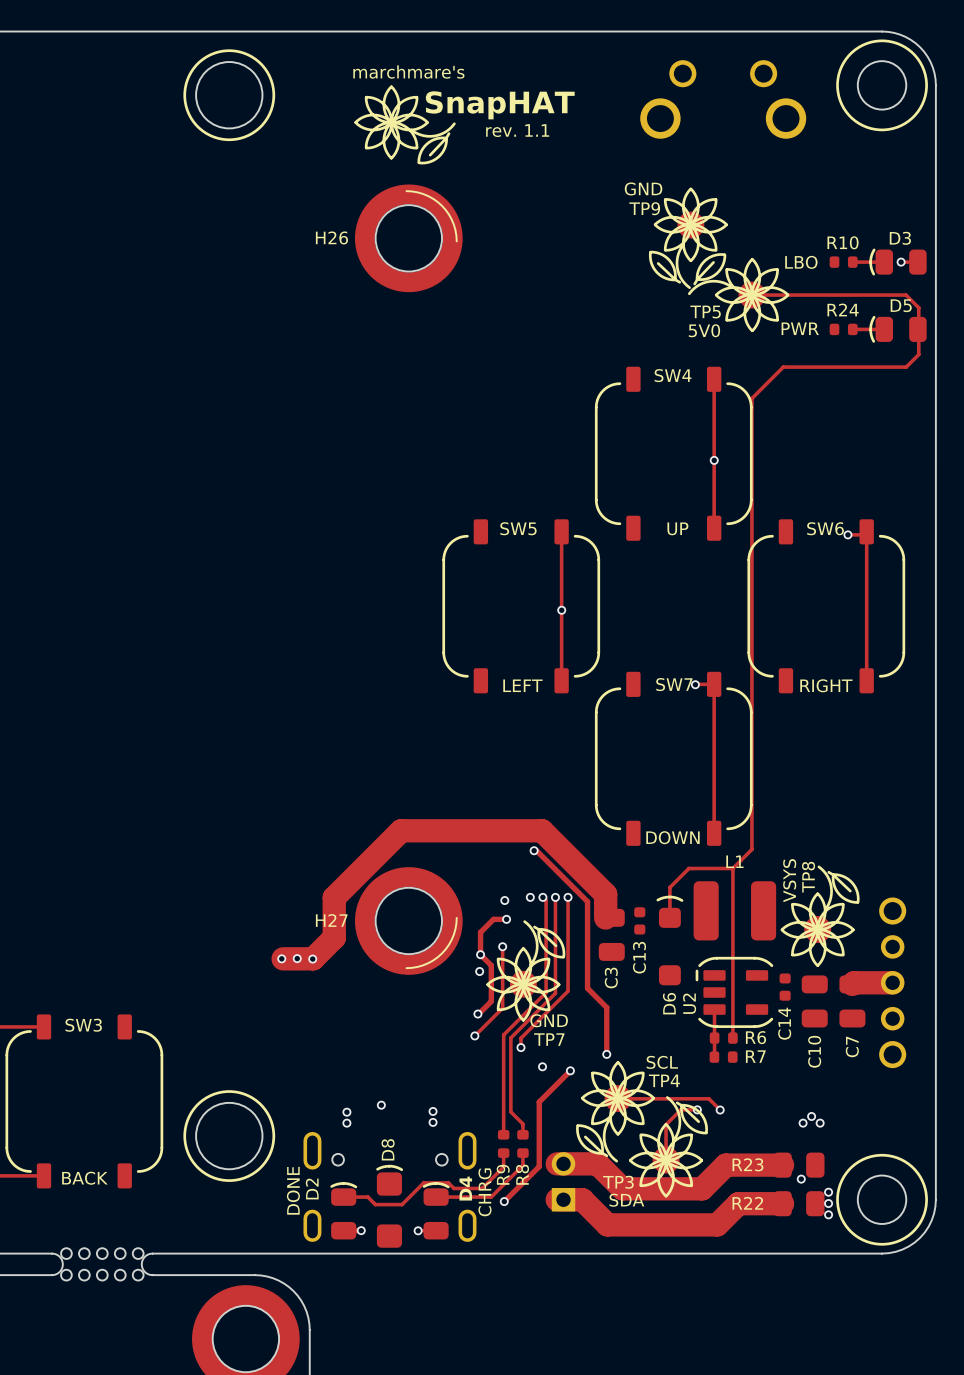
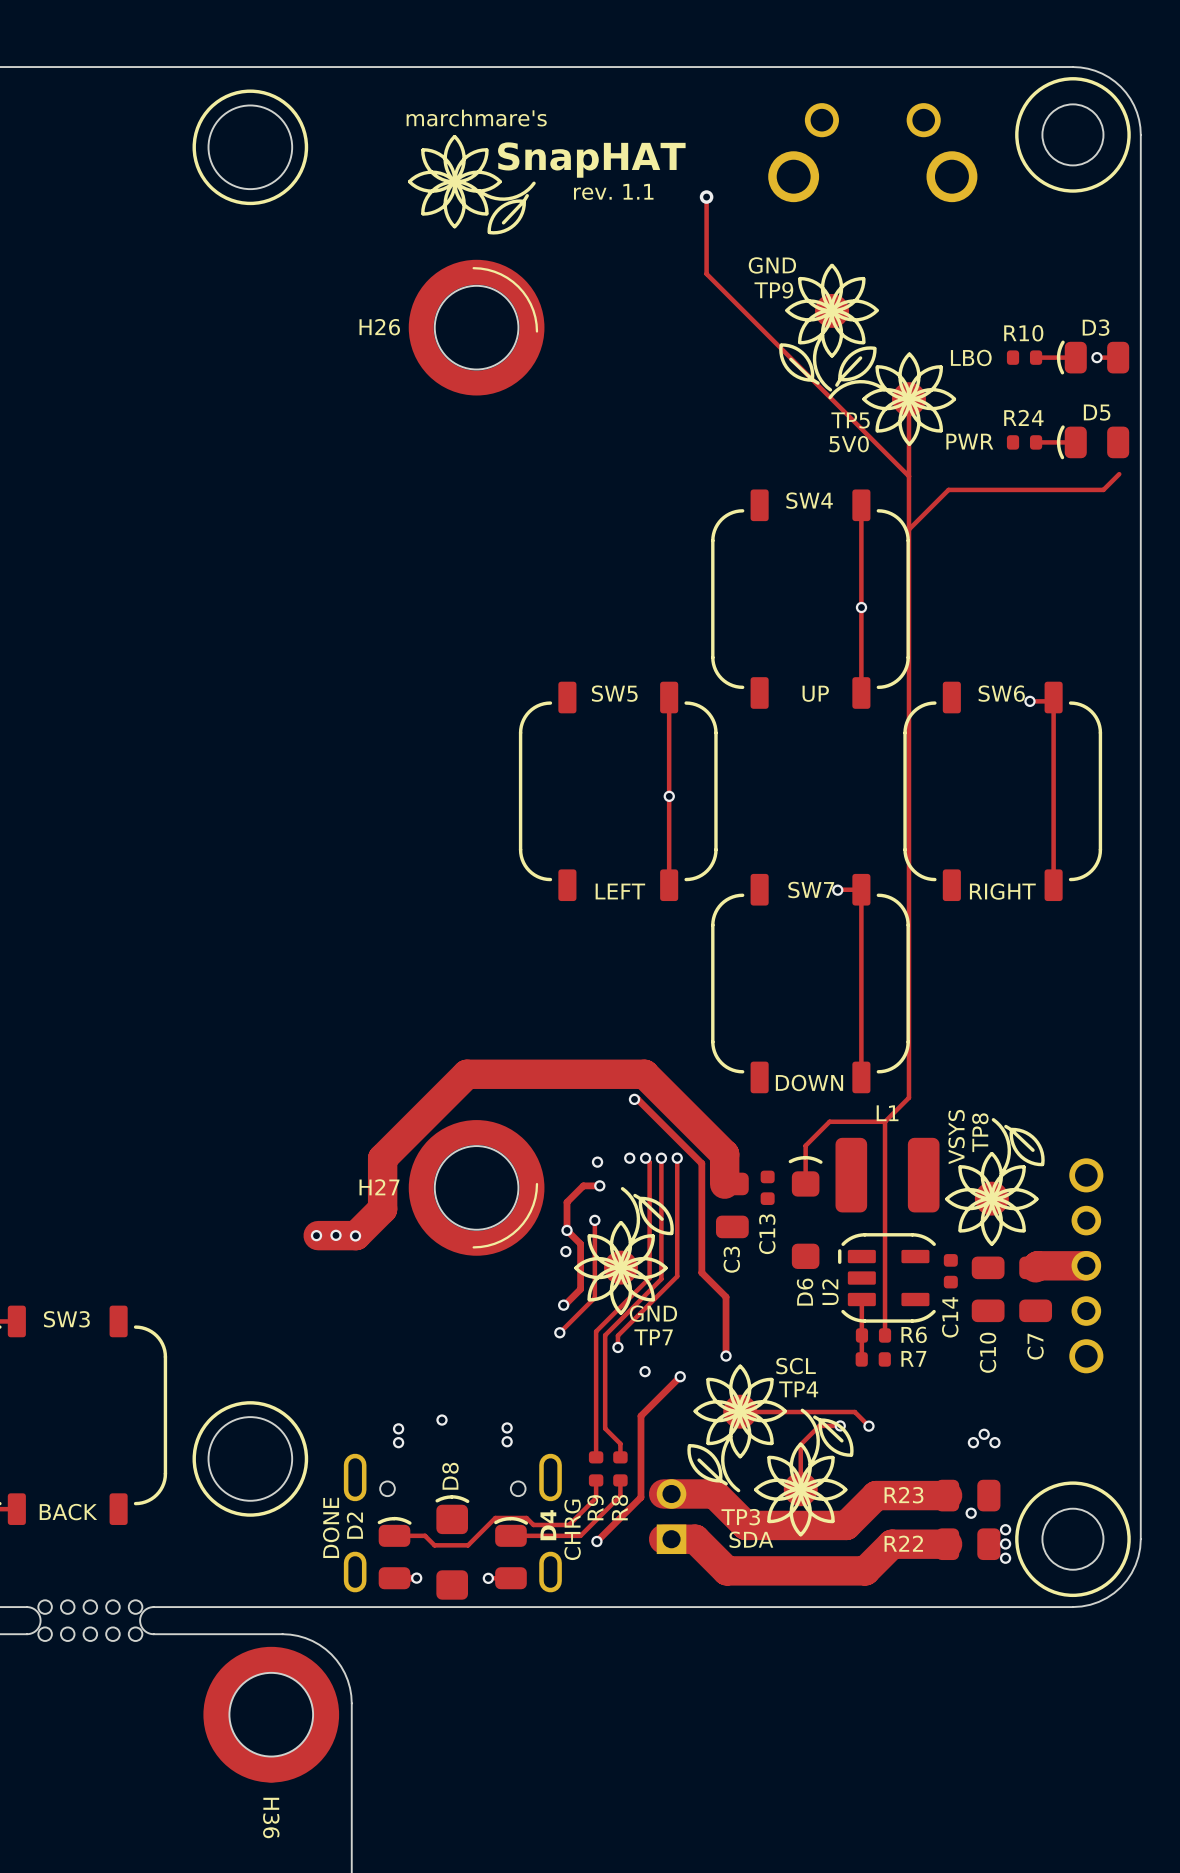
track: none -> (706, 197) (706, 273) (908, 476)
via: none -> (706, 197)
track: (751, 295) (906, 295) (918, 307) (918, 354) -> (908, 399) (908, 529)

